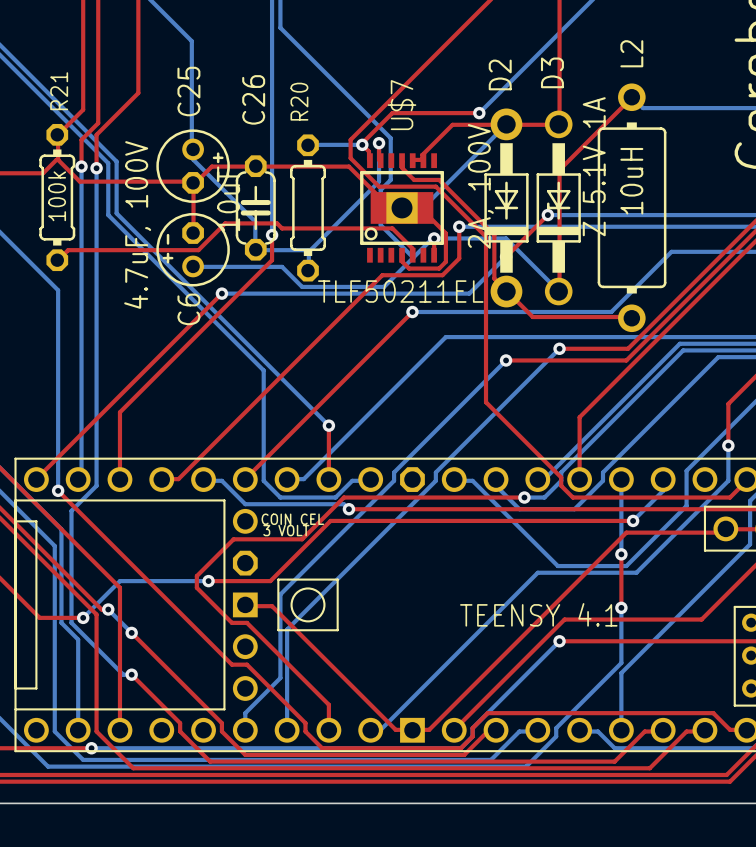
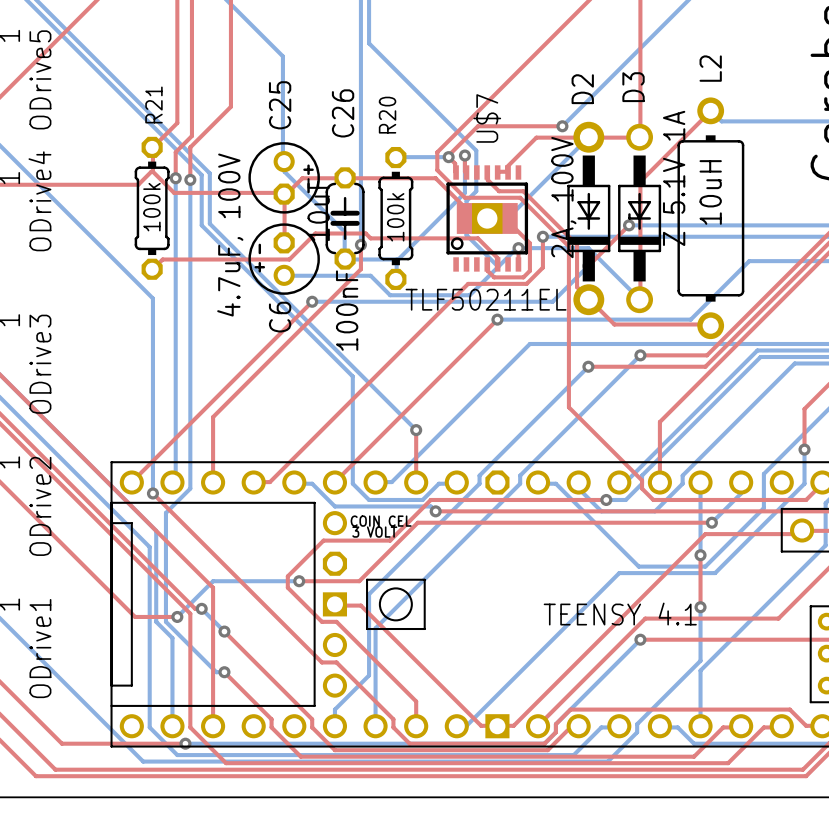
R20 value: none -> 100k (395, 217)
C26 value: none -> 100nF (347, 310)

